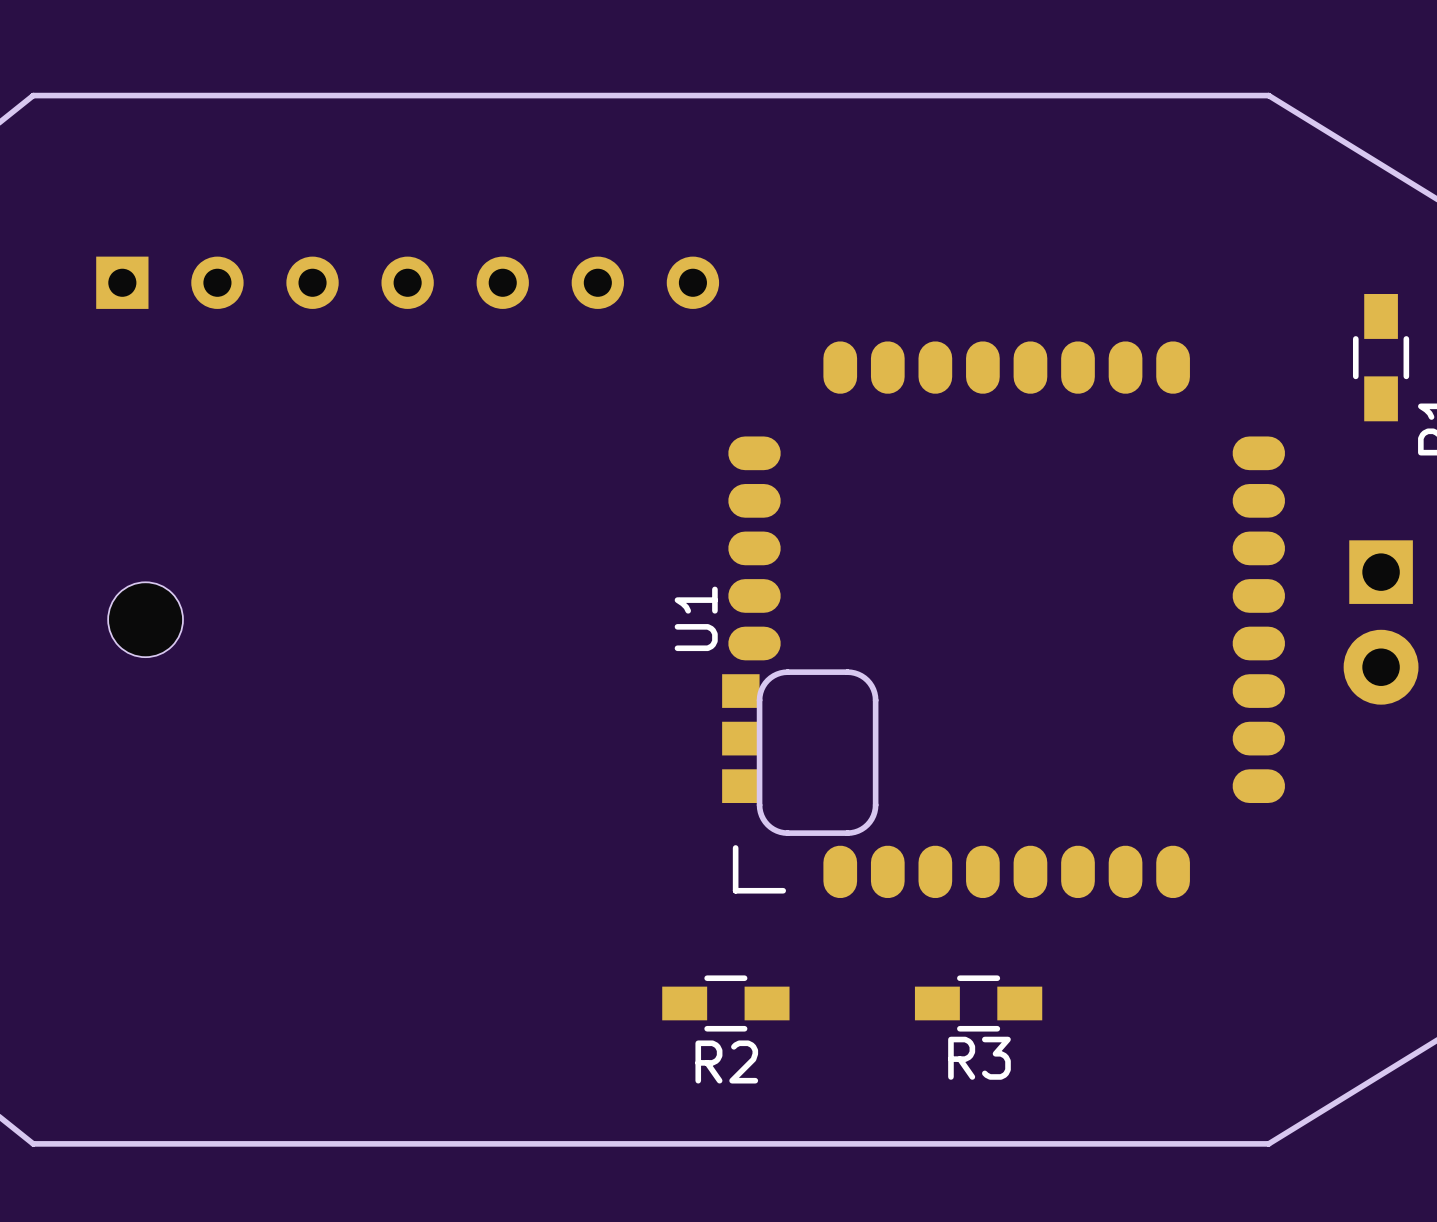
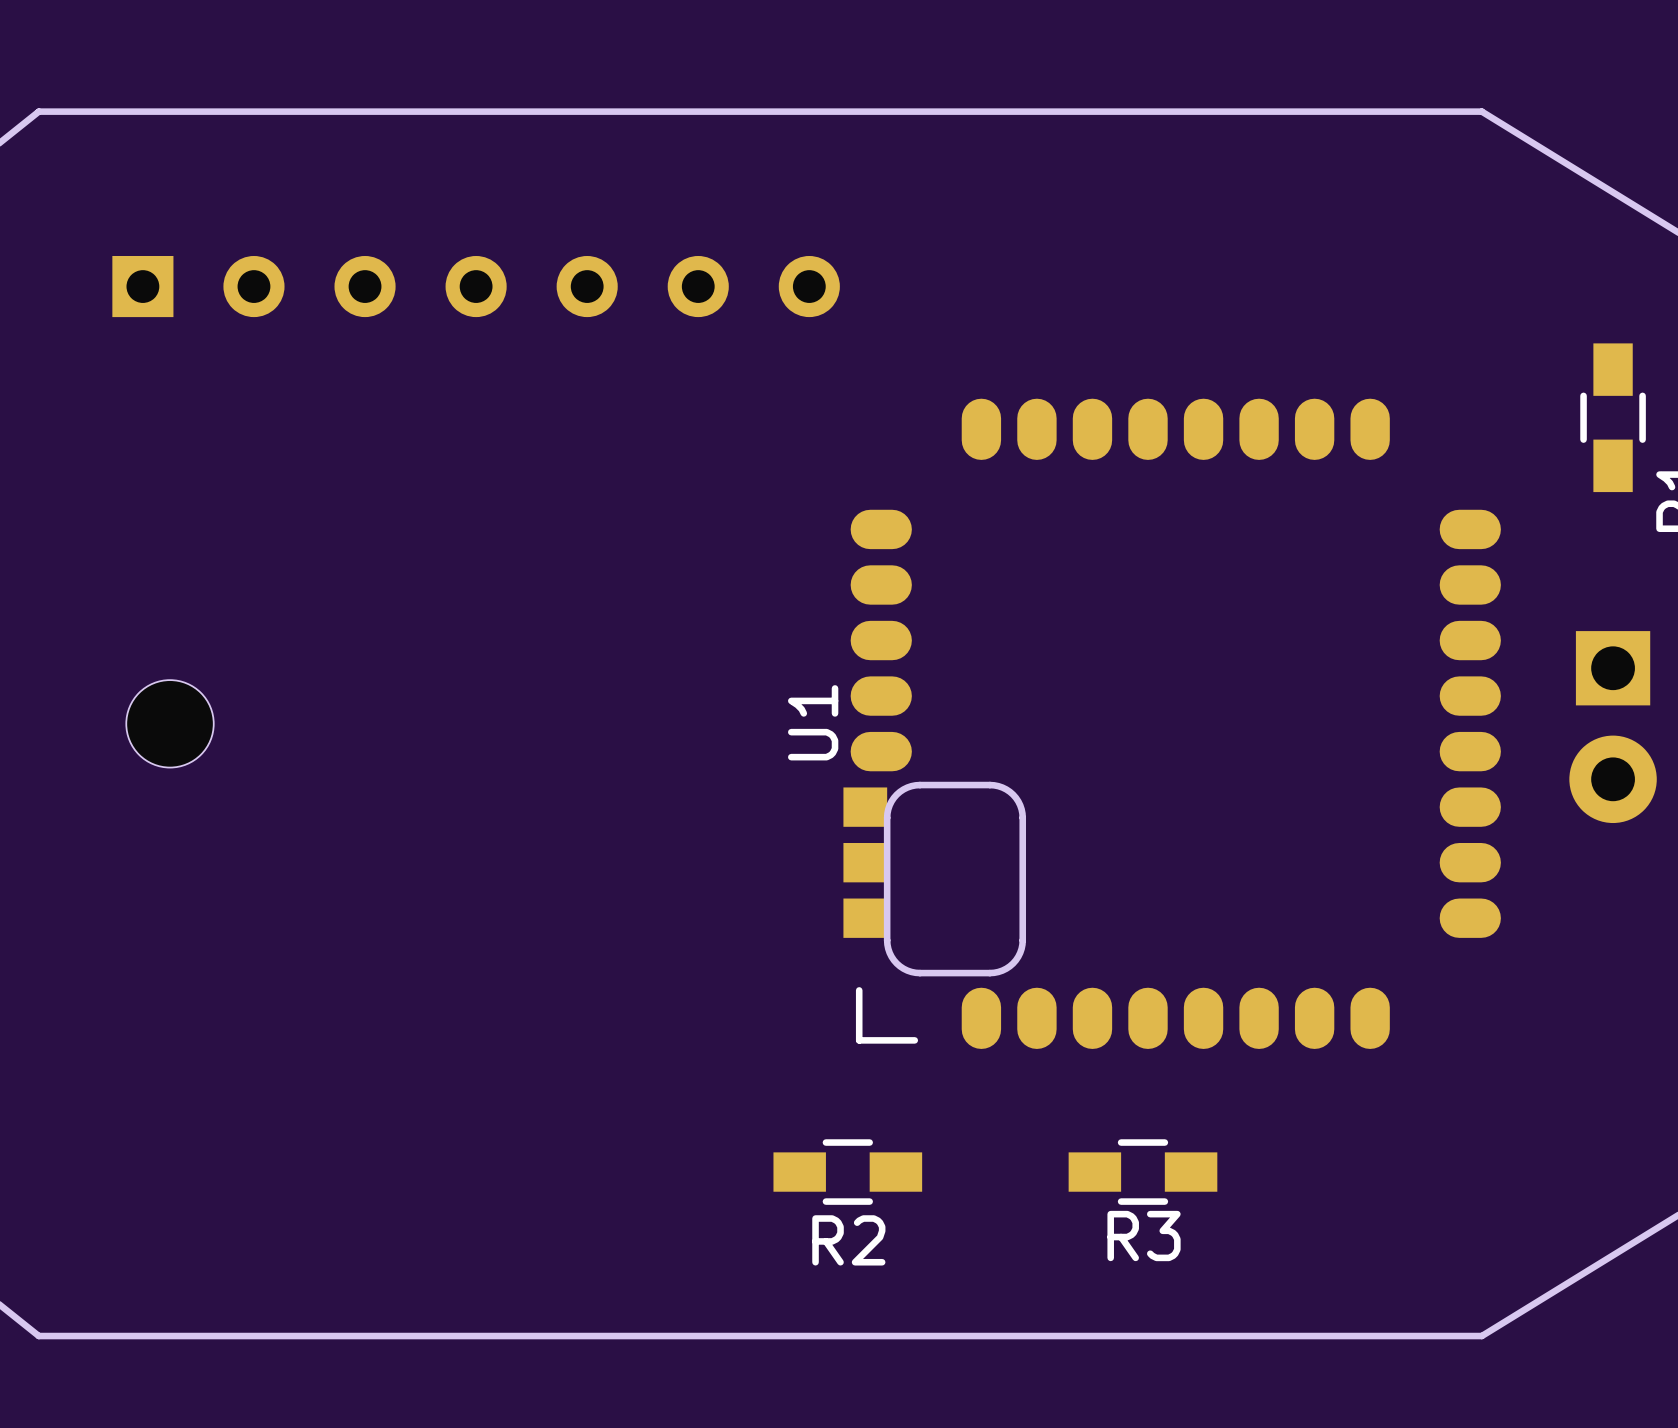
part position: (407, 282) -> (476, 286)

